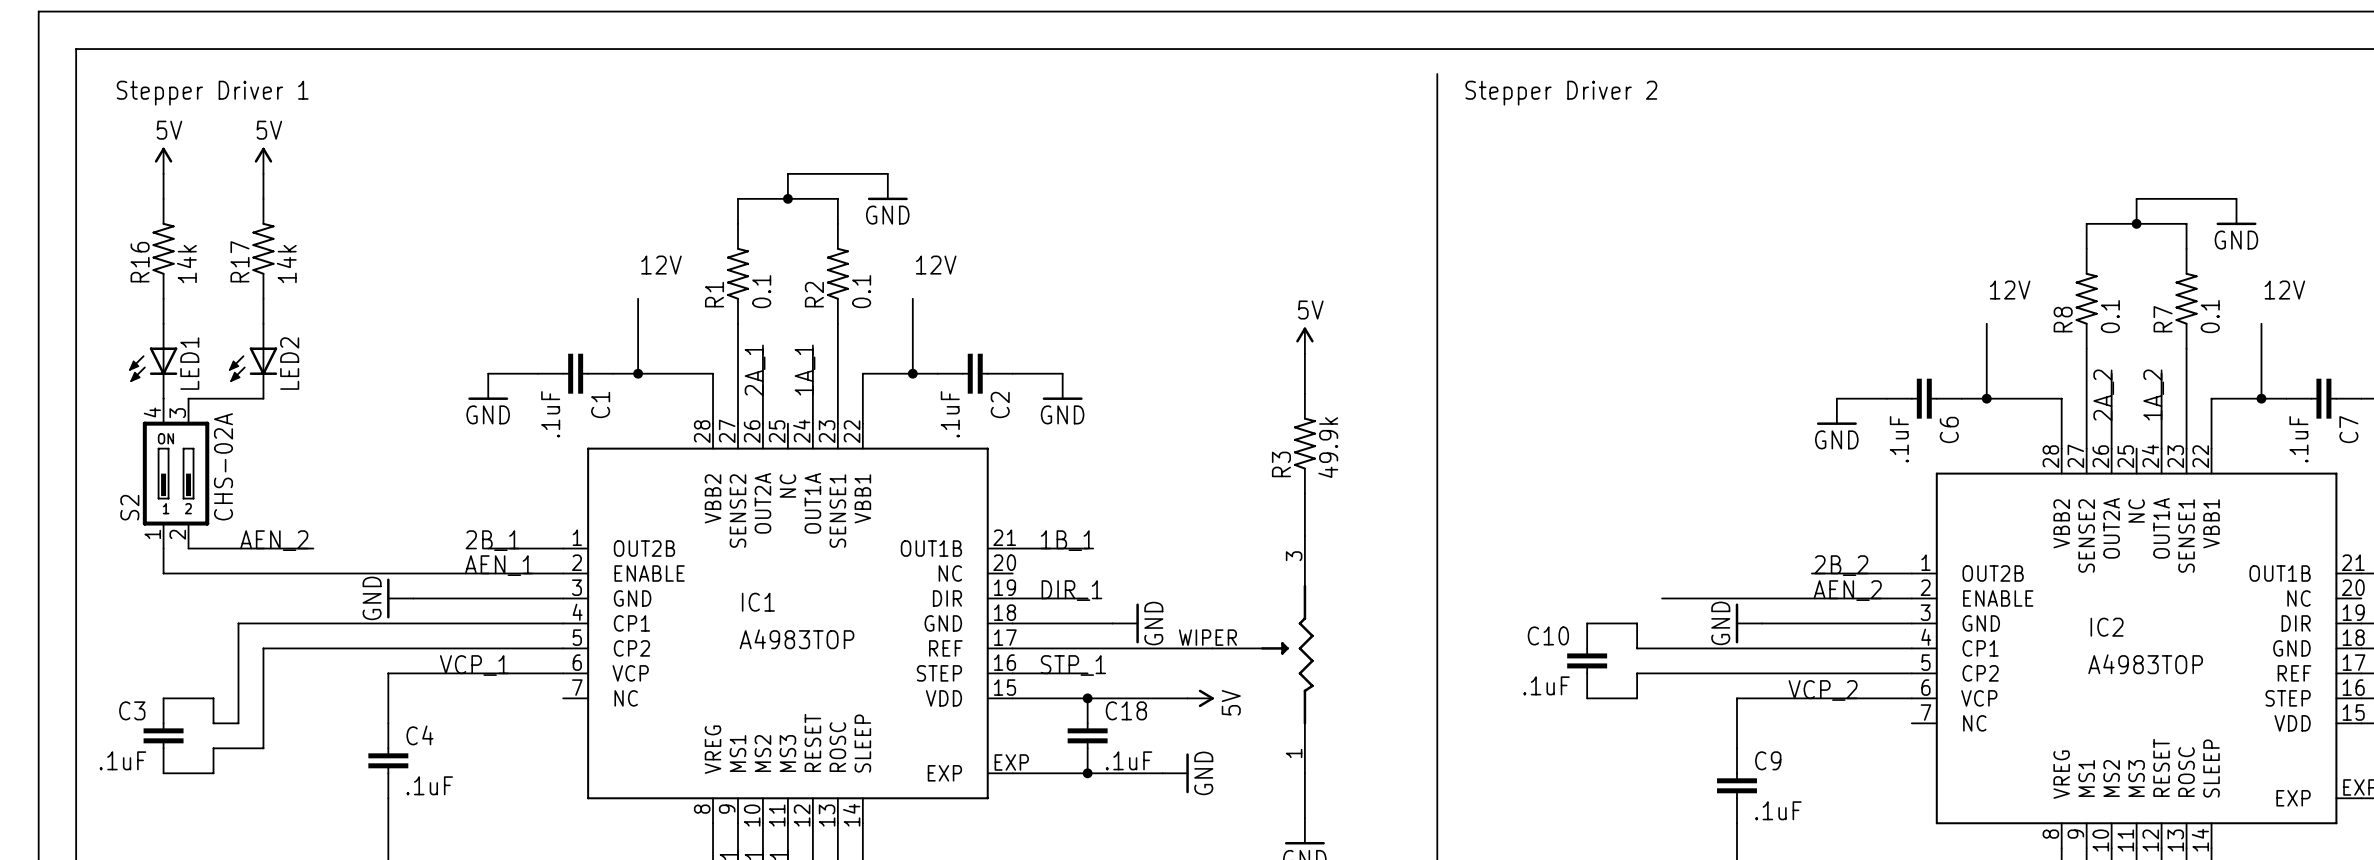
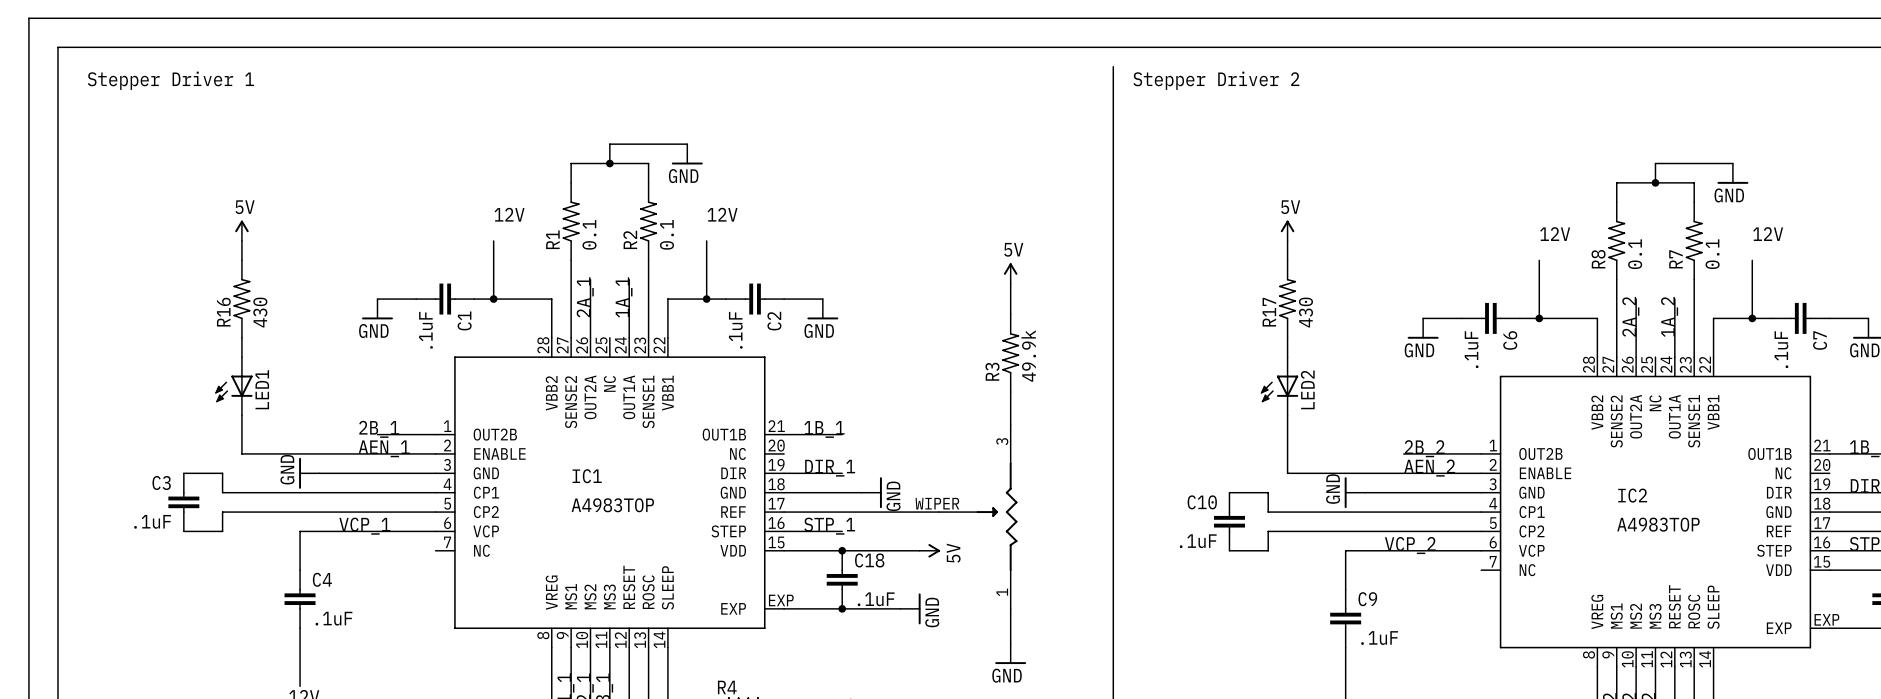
power symbol: 5V (163, 160) -> none
power symbol: 5V (263, 160) -> none
wire: (163, 173) (163, 198) -> none
wire: (263, 173) (263, 198) -> (241, 240) (241, 260)
R16 position: (163, 248) -> (241, 299)
R17 position: (263, 248) -> (1287, 299)
R16 value: 14k (186, 264) -> 430 (260, 312)
R17 value: 14k (286, 264) -> 430 (1305, 312)
power symbol: none -> 5V (241, 230)
power symbol: none -> 5V (1287, 230)
wire: (163, 298) (163, 323) -> none
wire: (263, 298) (263, 323) -> (241, 337) (241, 357)
wire: none -> (1287, 240) (1287, 260)
LED1 position: (153, 361) -> (233, 386)
LED2 position: (253, 361) -> (1279, 386)
wire: (188, 398) (263, 398) -> none
wire: none -> (1287, 337) (1287, 357)
S2: CHS-02A (176, 473) -> none
wire: none -> (1287, 415) (1287, 473)
label: AEN_2 (274, 540) -> none
wire: (163, 548) (163, 573) (313, 573) -> (241, 415) (241, 453)
wire: (188, 548) (313, 548) -> none
wire: (288, 623) (238, 623) (238, 723) (213, 723) (213, 698) (163, 698) -> (222, 492) (222, 473) (183, 473)
wire: (288, 648) (263, 648) (263, 748) (213, 748) (213, 773) (163, 773) -> (222, 512) (222, 531) (183, 531)
C3 position: (163, 735) -> (183, 502)

